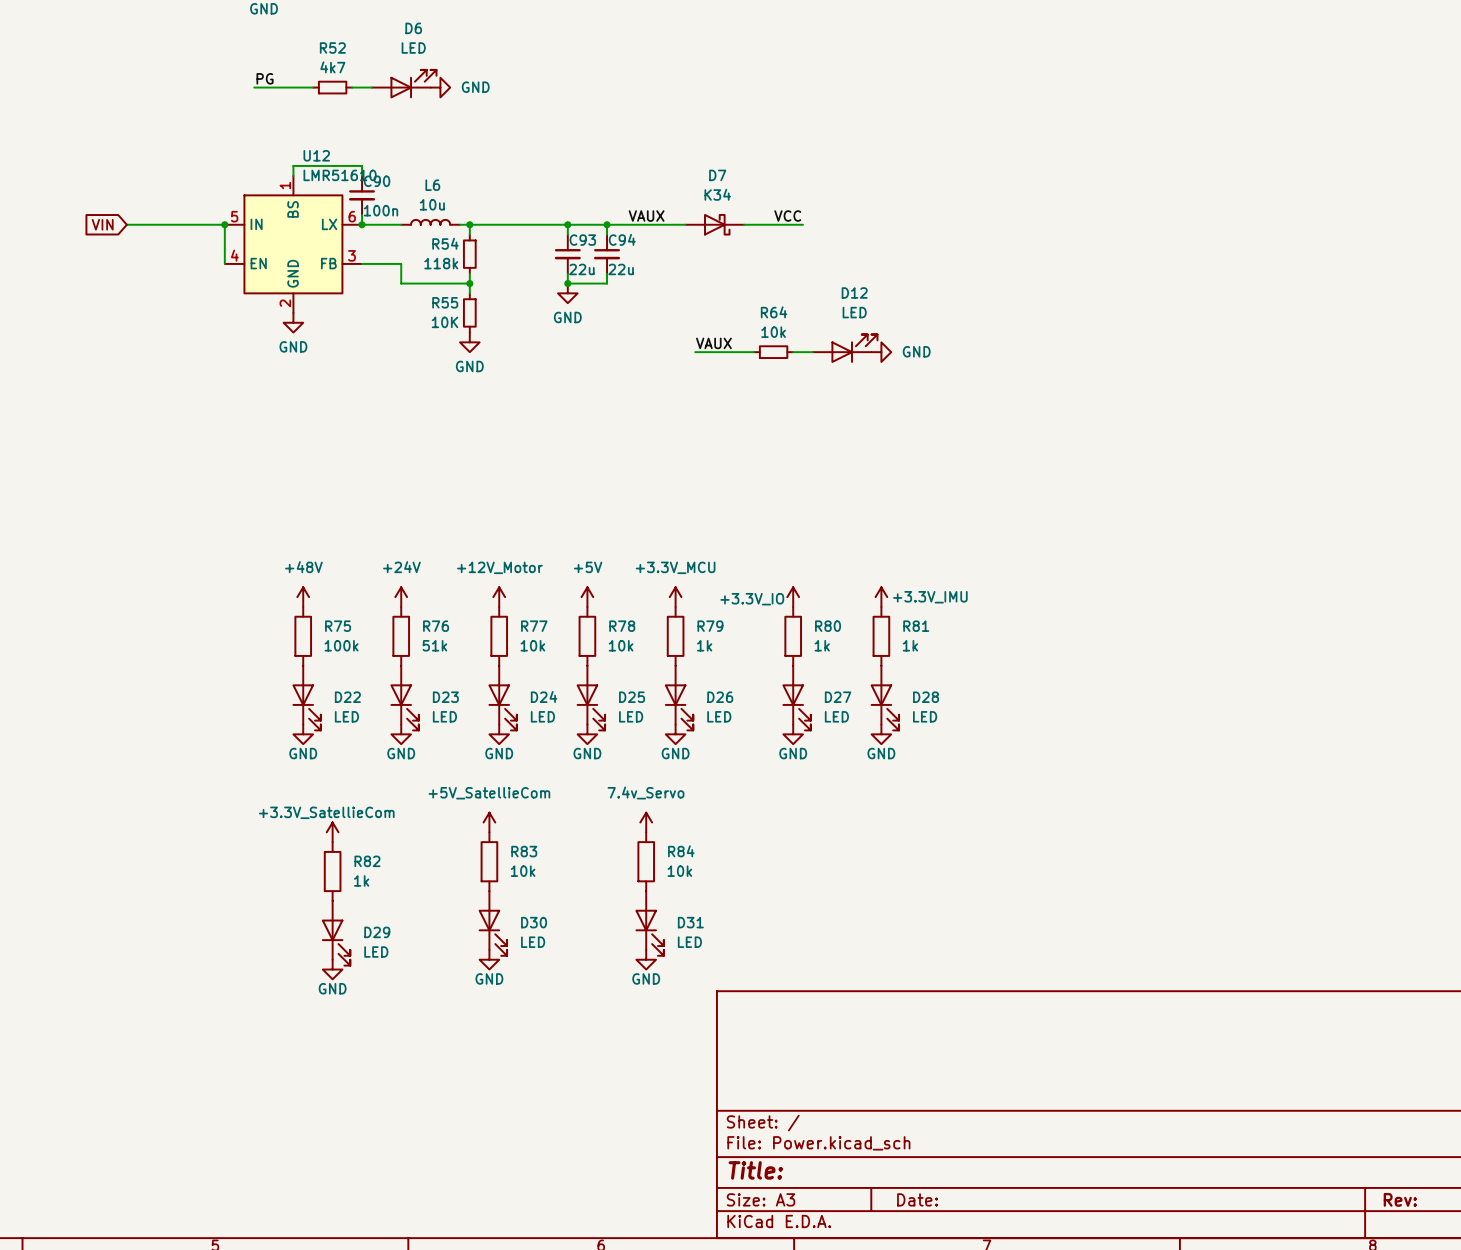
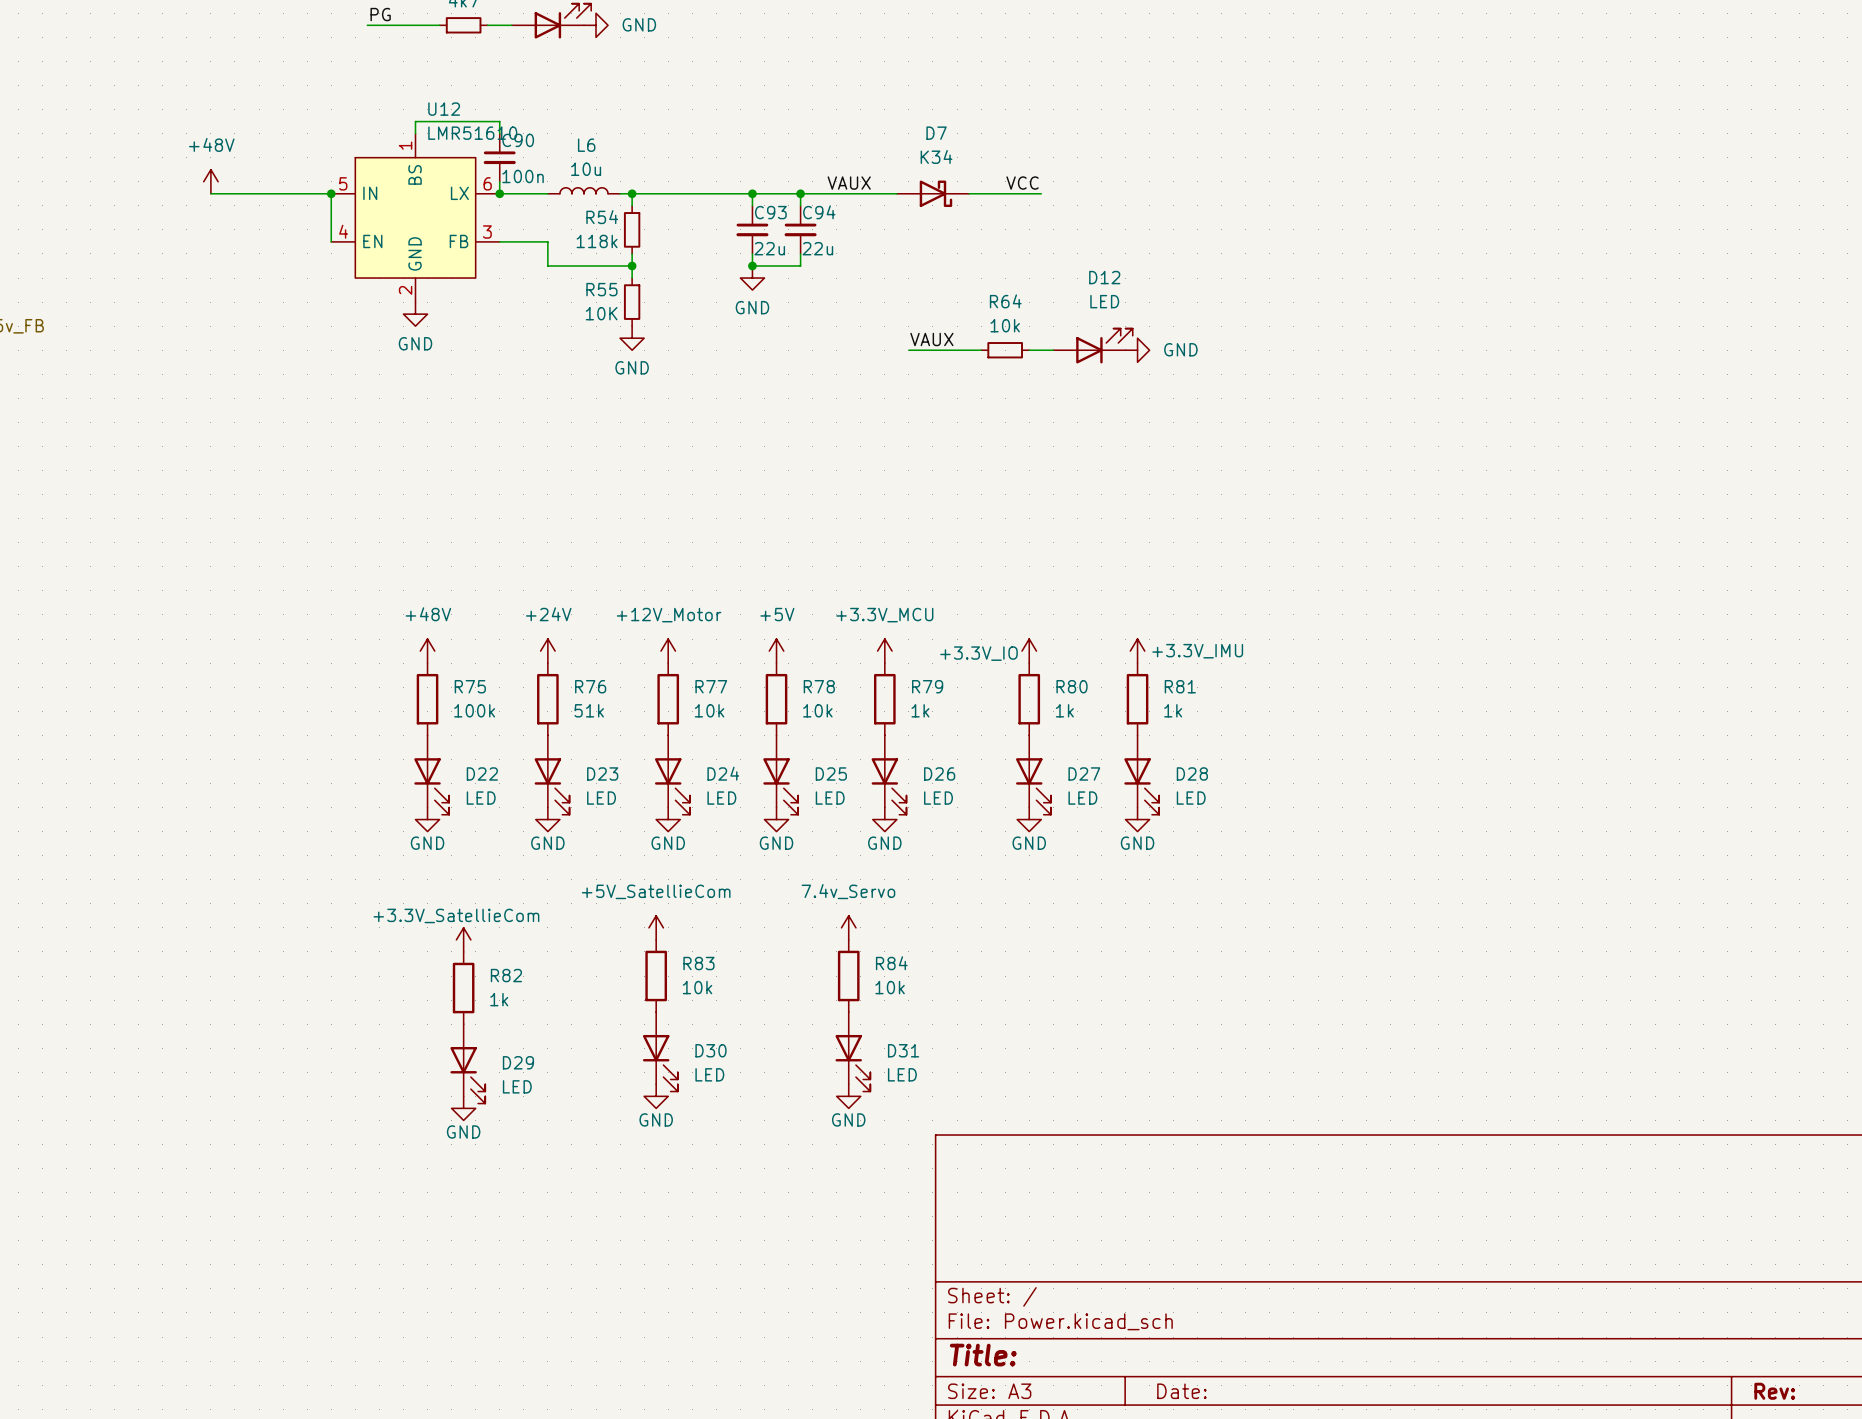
power symbol: none -> +48V (210, 181)
global label: VIN (102, 224) -> none

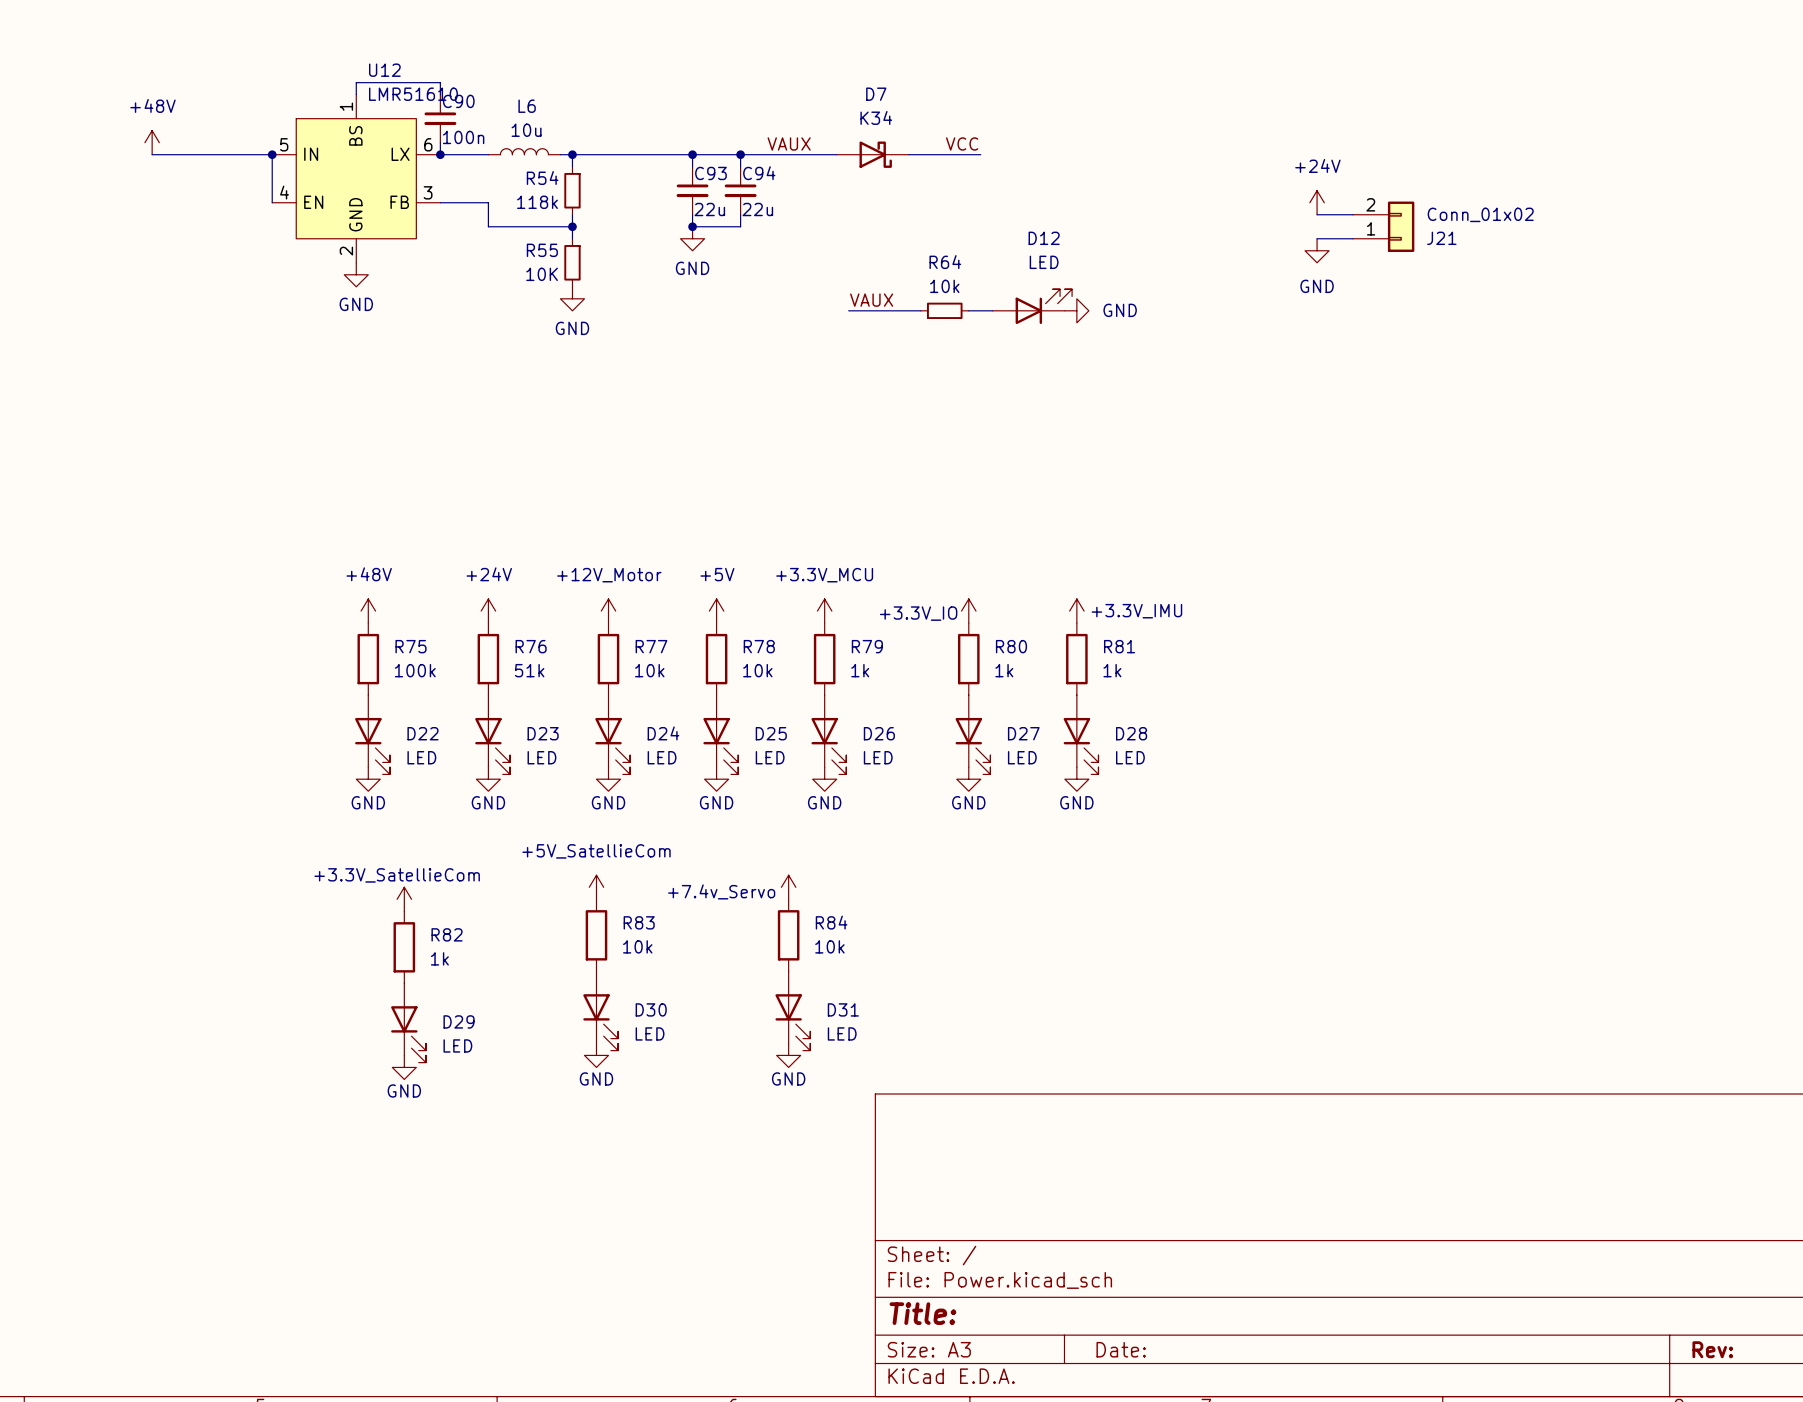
power symbol: none -> +24V (1317, 202)
wire: none -> (1317, 214) (1353, 214)
J21: none -> Conn_01x02 (1383, 226)
wire: none -> (1317, 238) (1353, 238)
power symbol: none -> GND (1317, 250)
power symbol: 7.4v_Servo (848, 927) -> +7.4v_Servo (788, 887)

